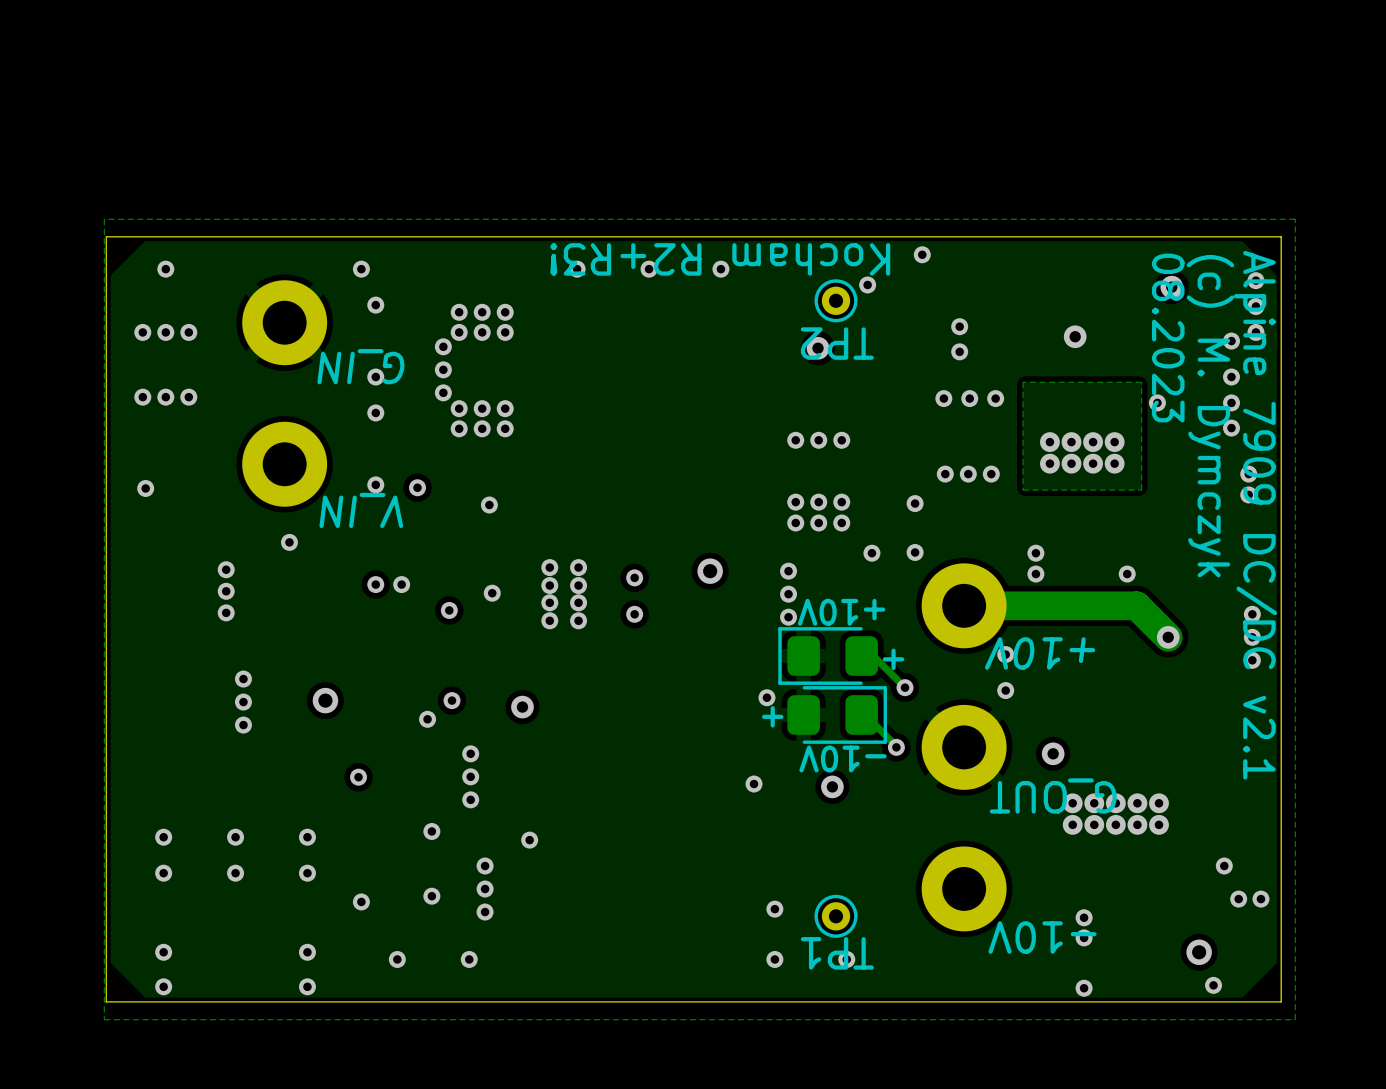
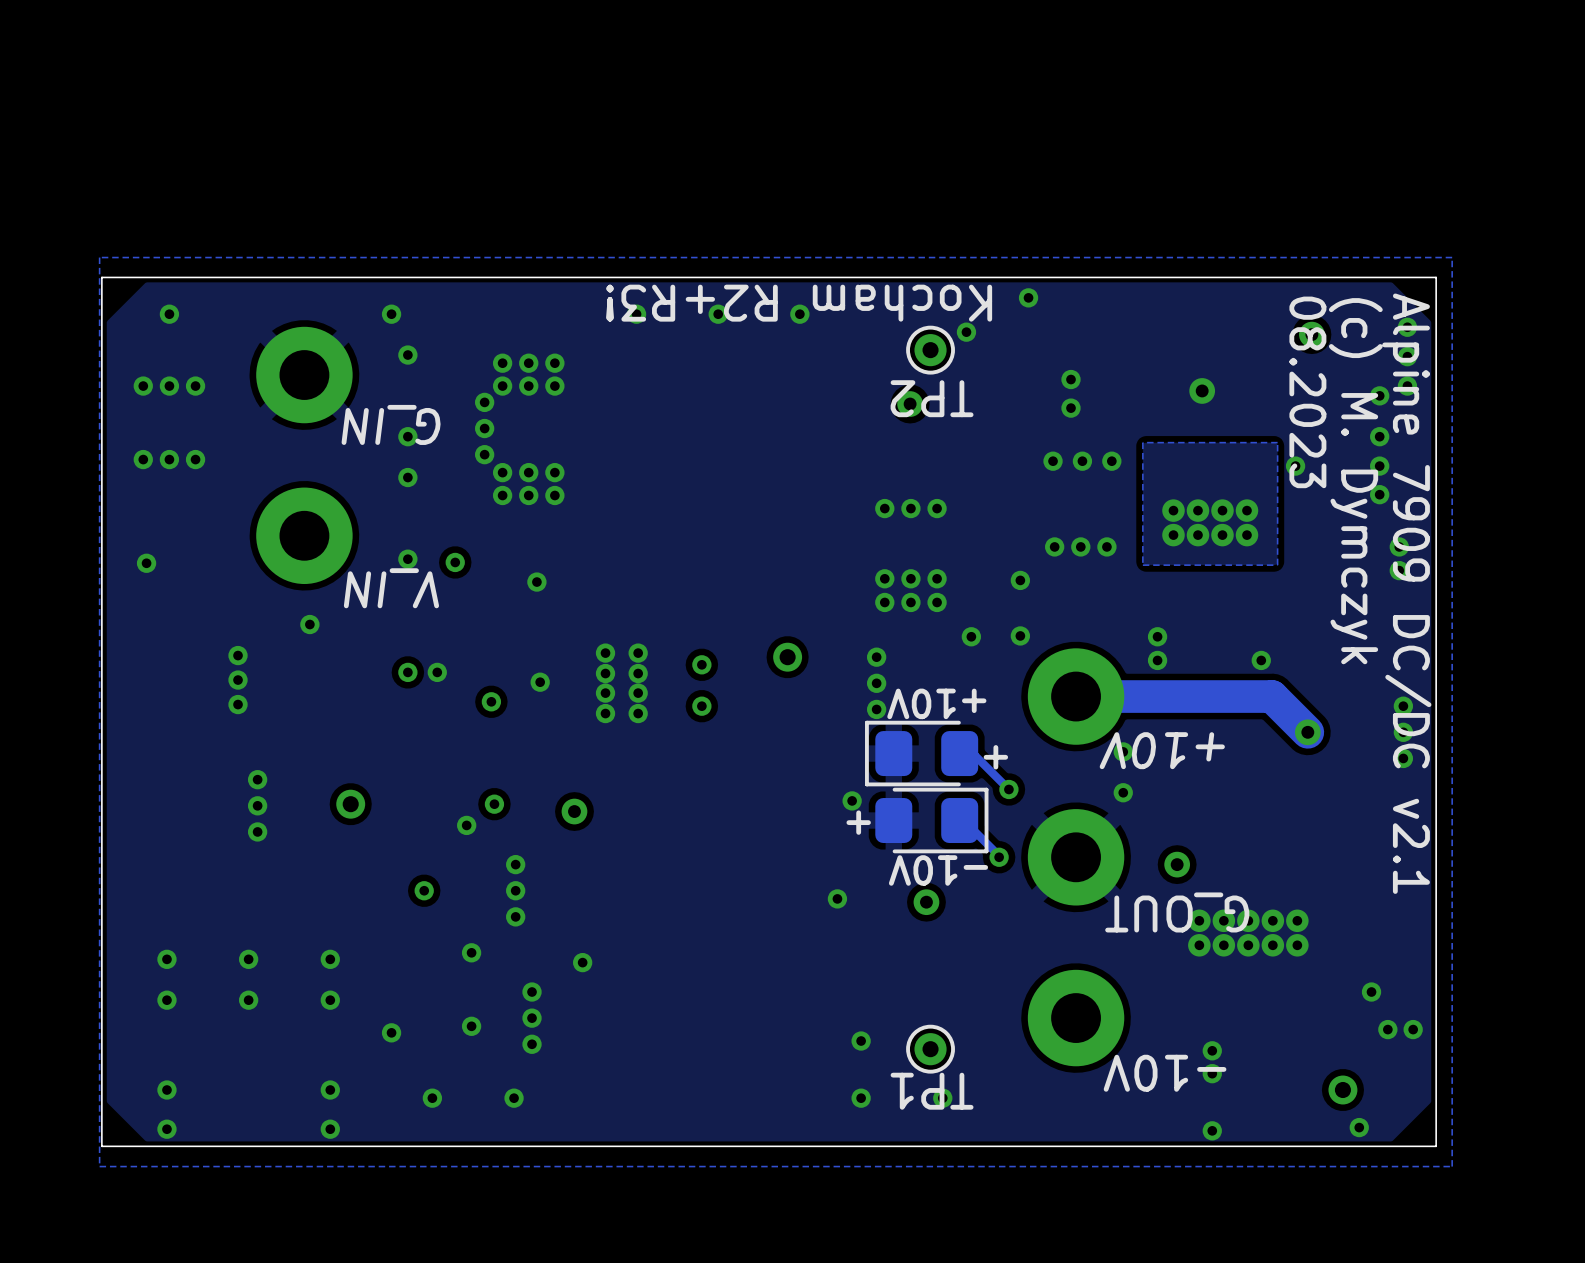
via position: (358, 777) -> (424, 890)

